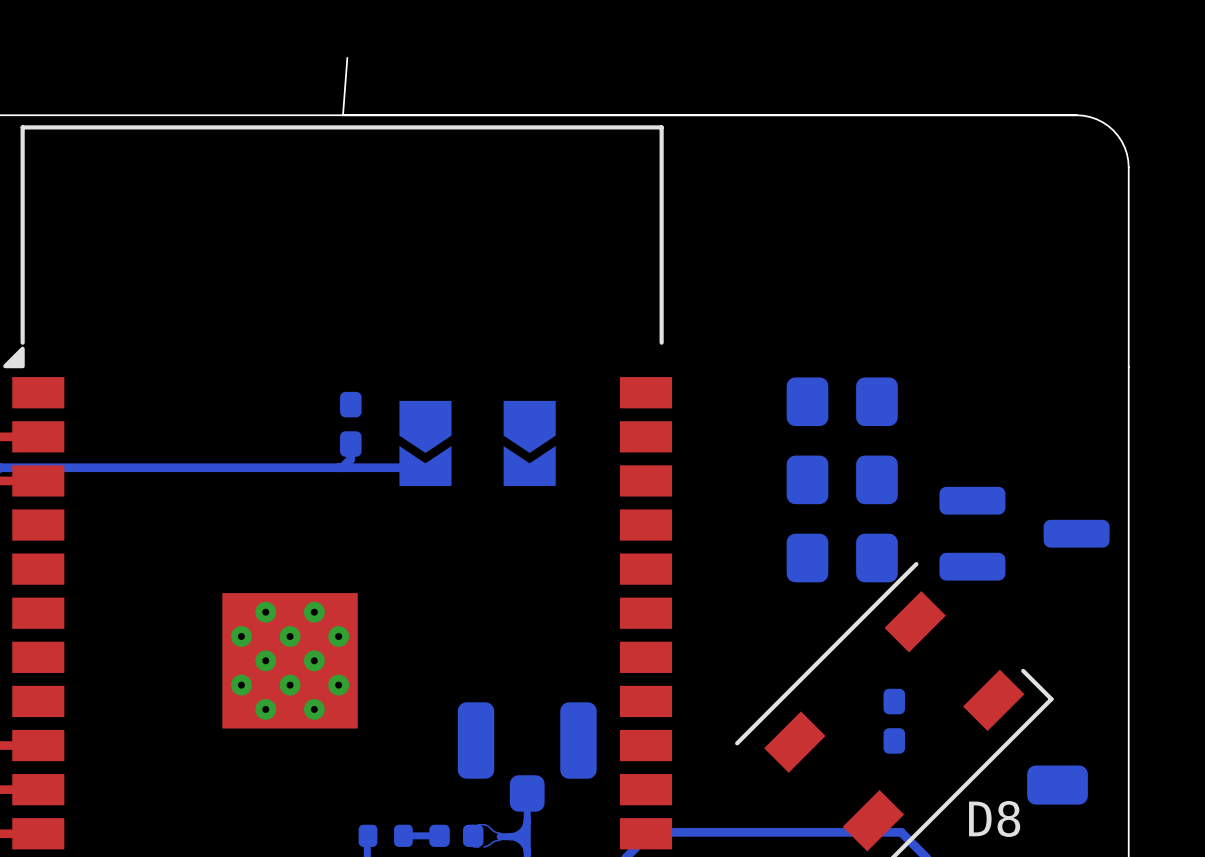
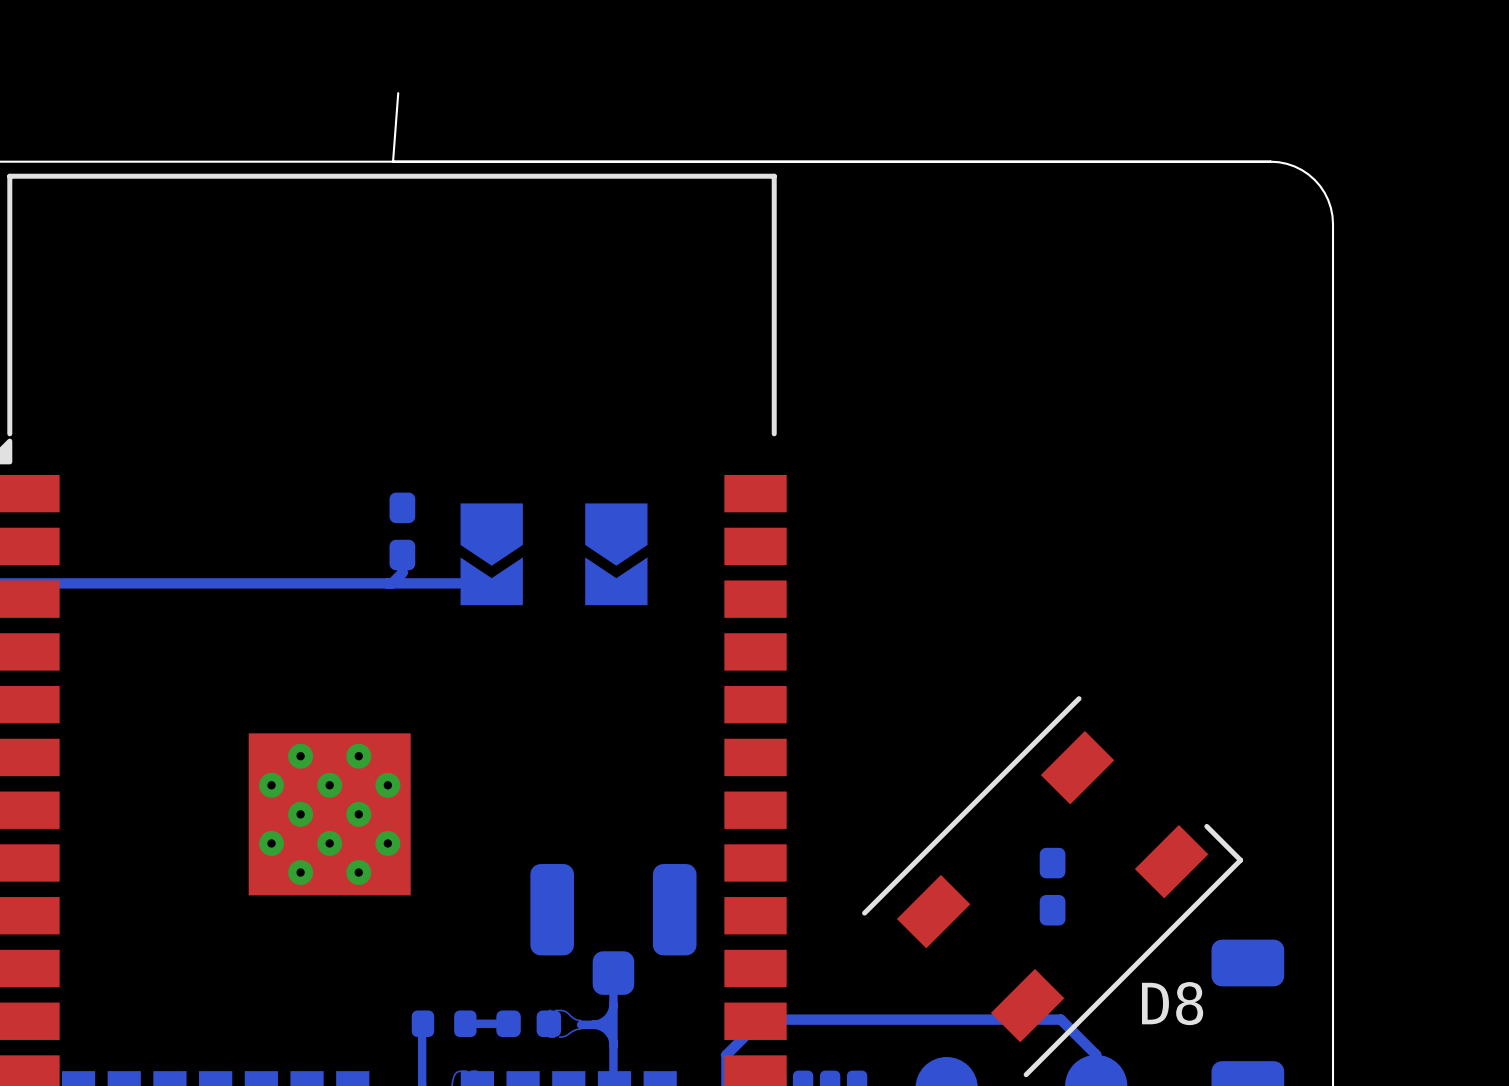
part: (842, 401) -> none
part: (842, 479) -> none
part: (1024, 533) -> none
part: (842, 558) -> none

